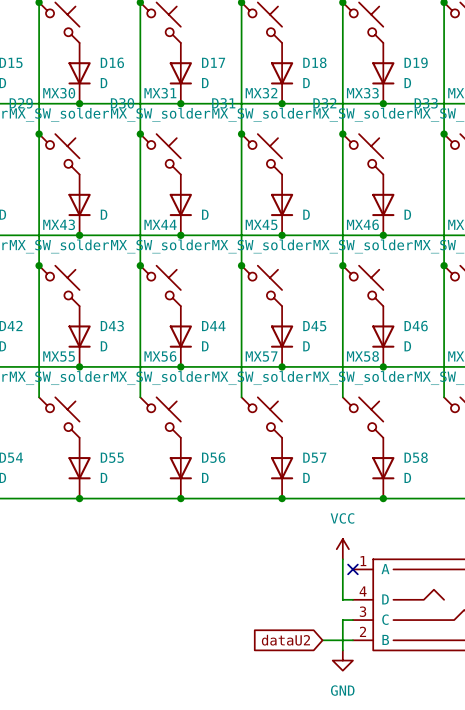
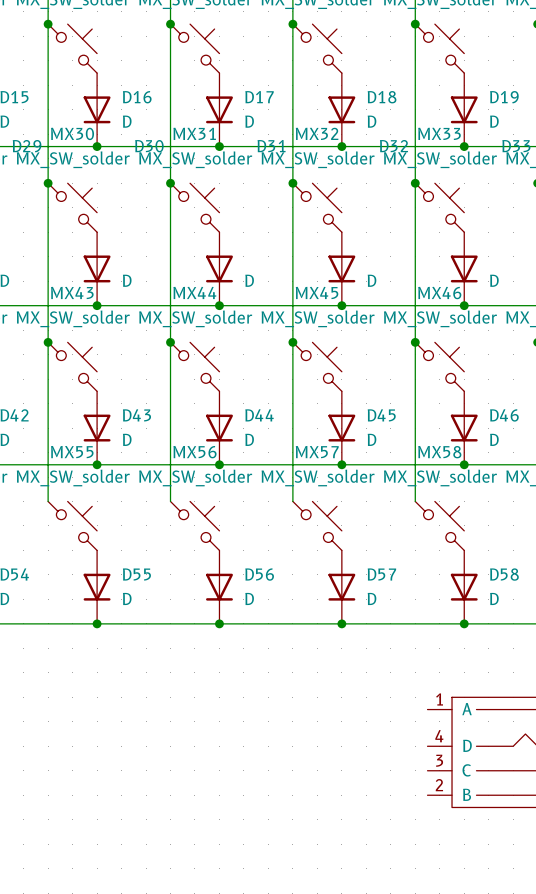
power symbol: VCC (342, 549) -> none
wire: (342, 559) (342, 599) (352, 599) -> none
no-connect mark: (352, 569) -> none
wire: (352, 620) (342, 620) (342, 650) -> none
global label: dataU2 (285, 640) -> none
wire: (322, 640) (352, 640) -> none
power symbol: GND (342, 660) -> none

